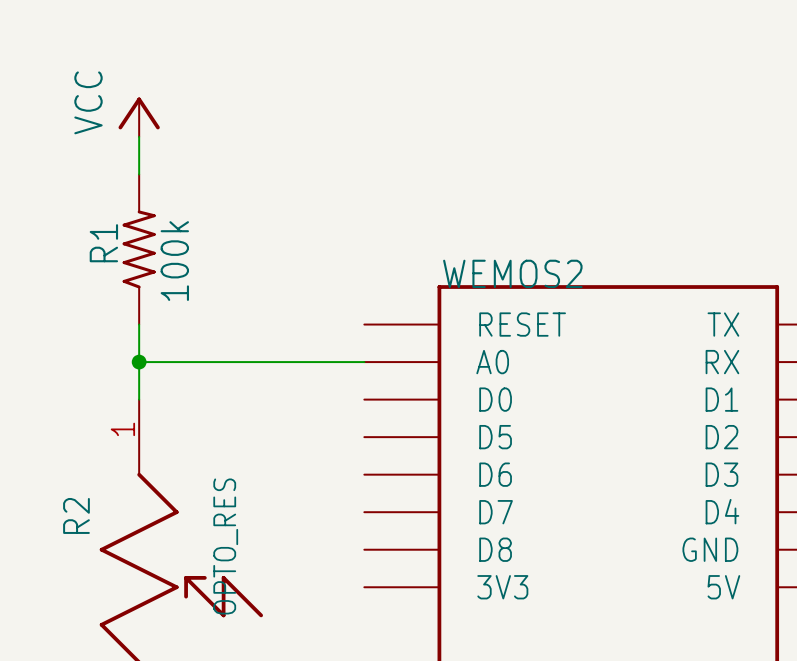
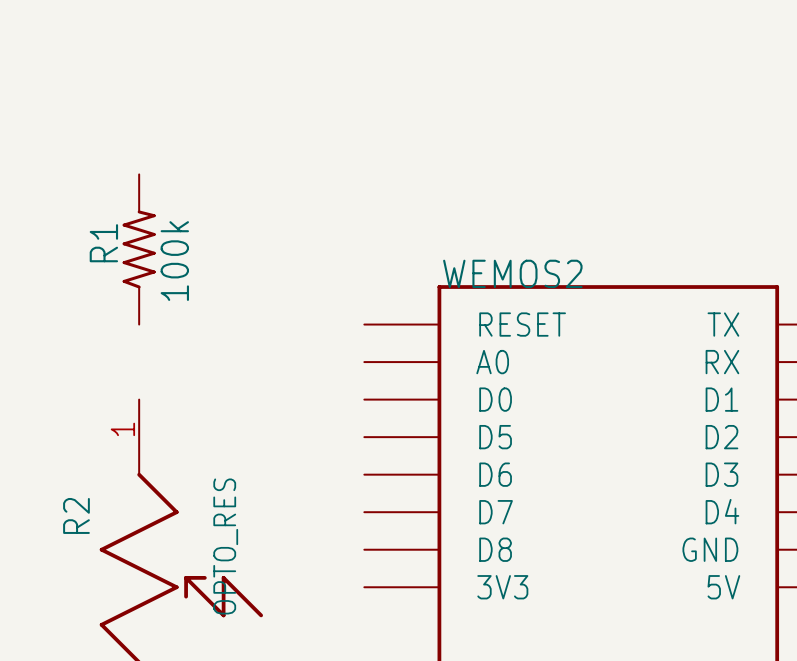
power symbol: VCC (139, 117) -> none
wire: (139, 136) (139, 174) -> none
wire: (139, 324) (139, 399) -> none
wire: (139, 362) (364, 362) -> none
junction: (139, 362) -> none

